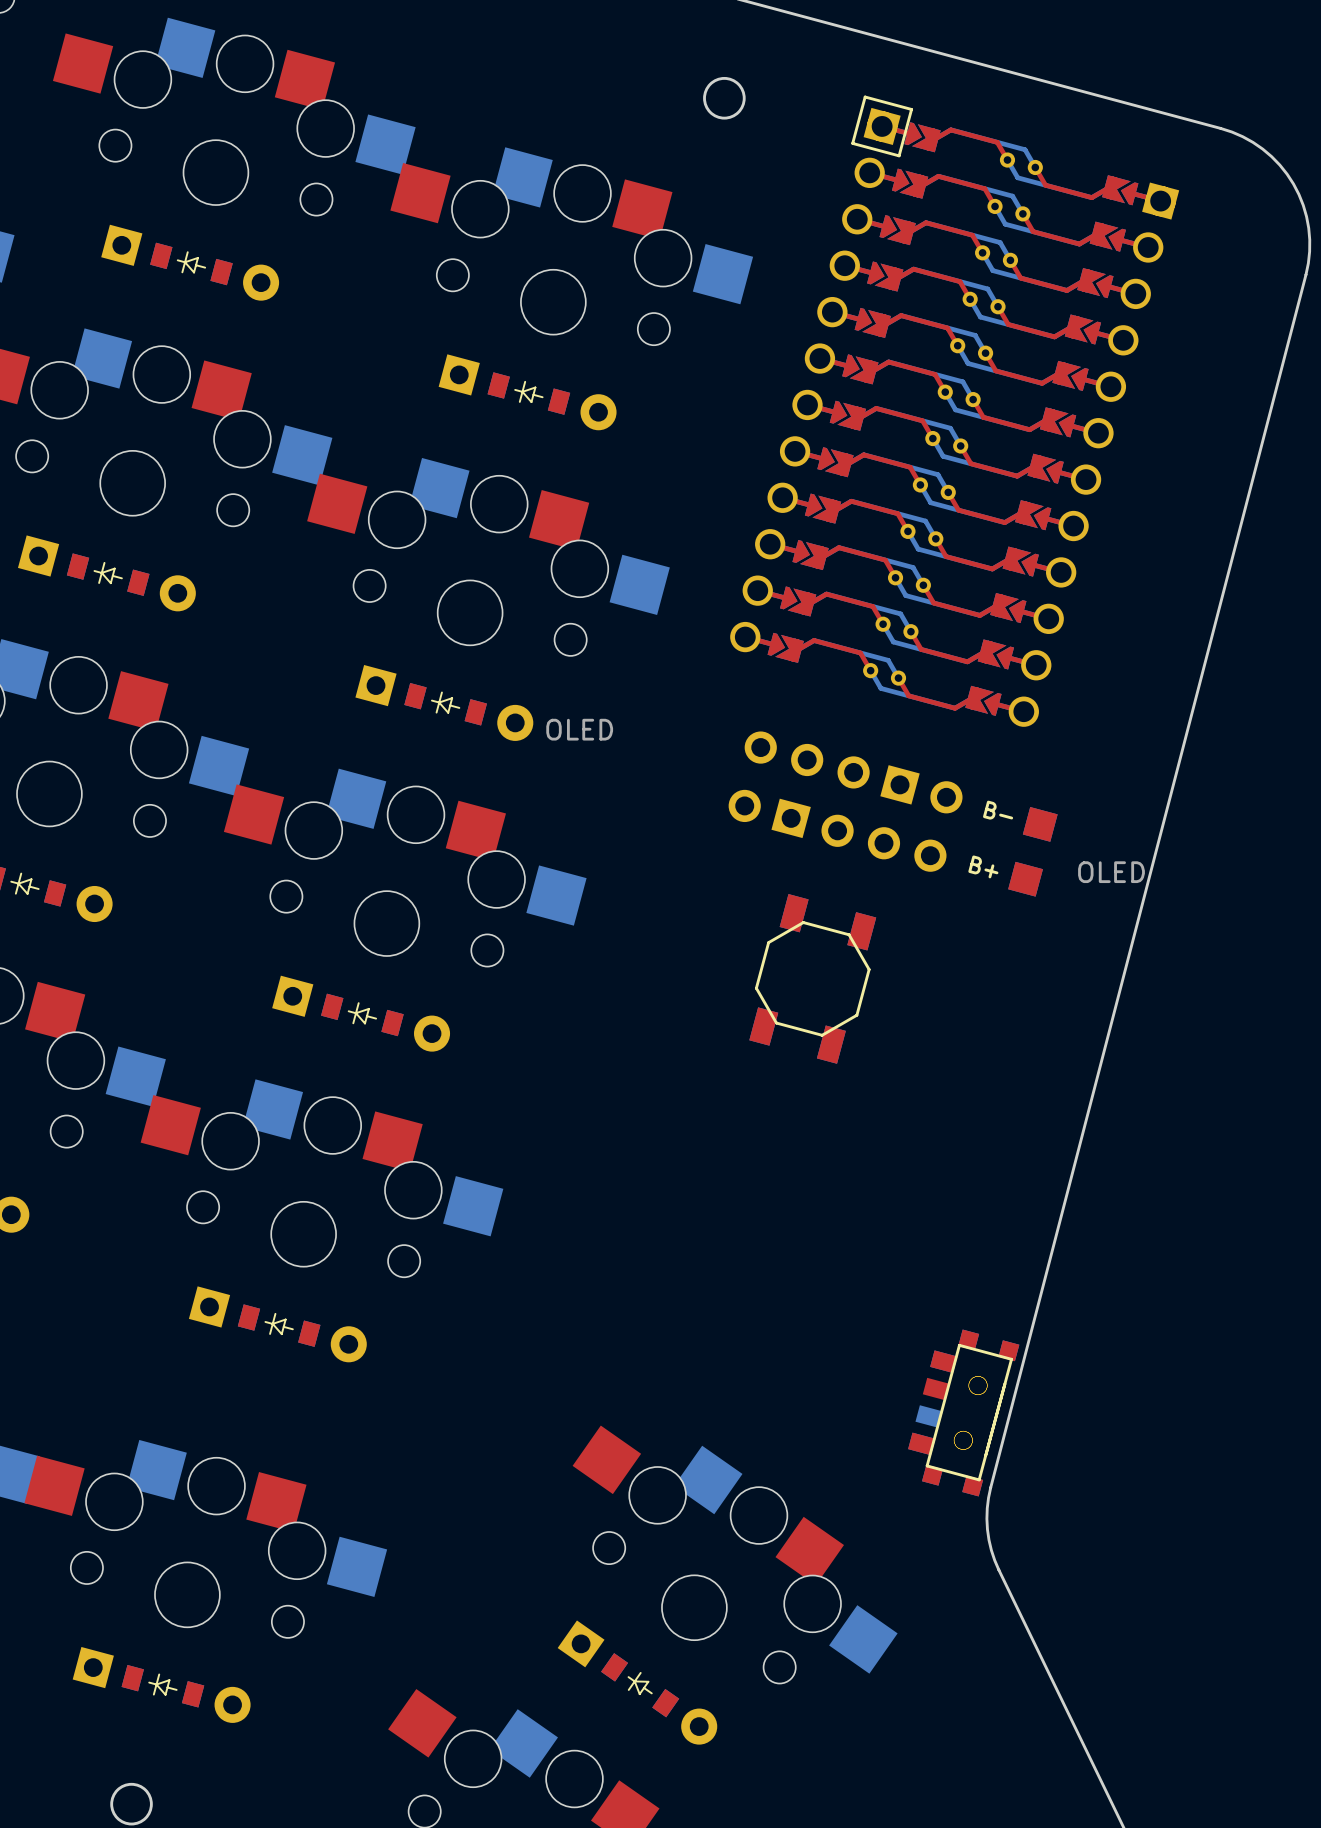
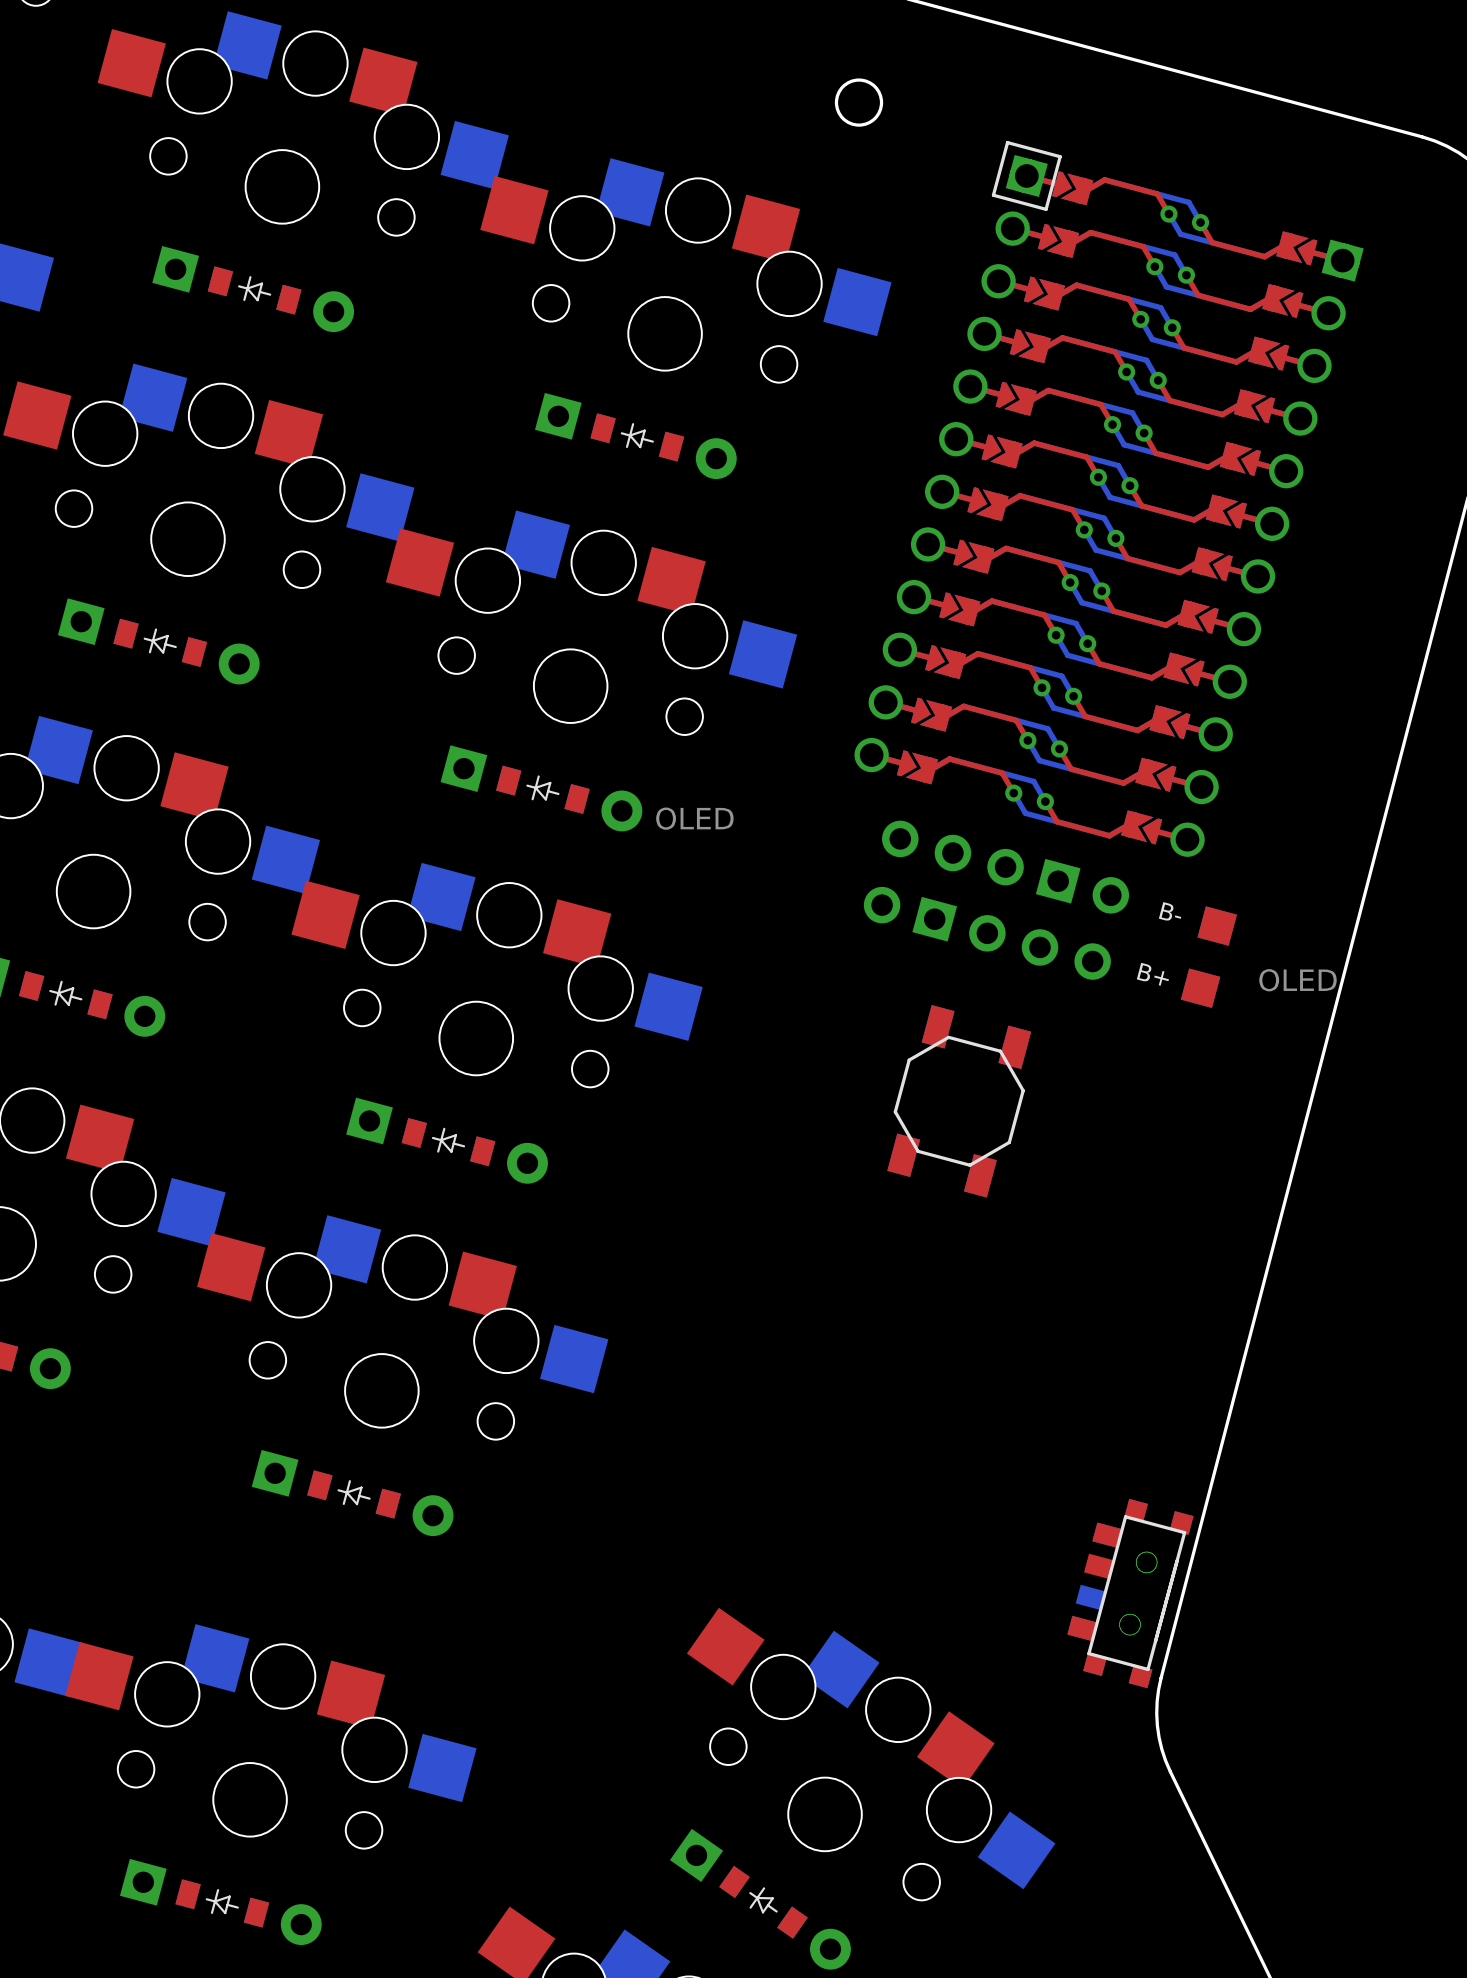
part position: (954, 411) -> (1109, 498)

